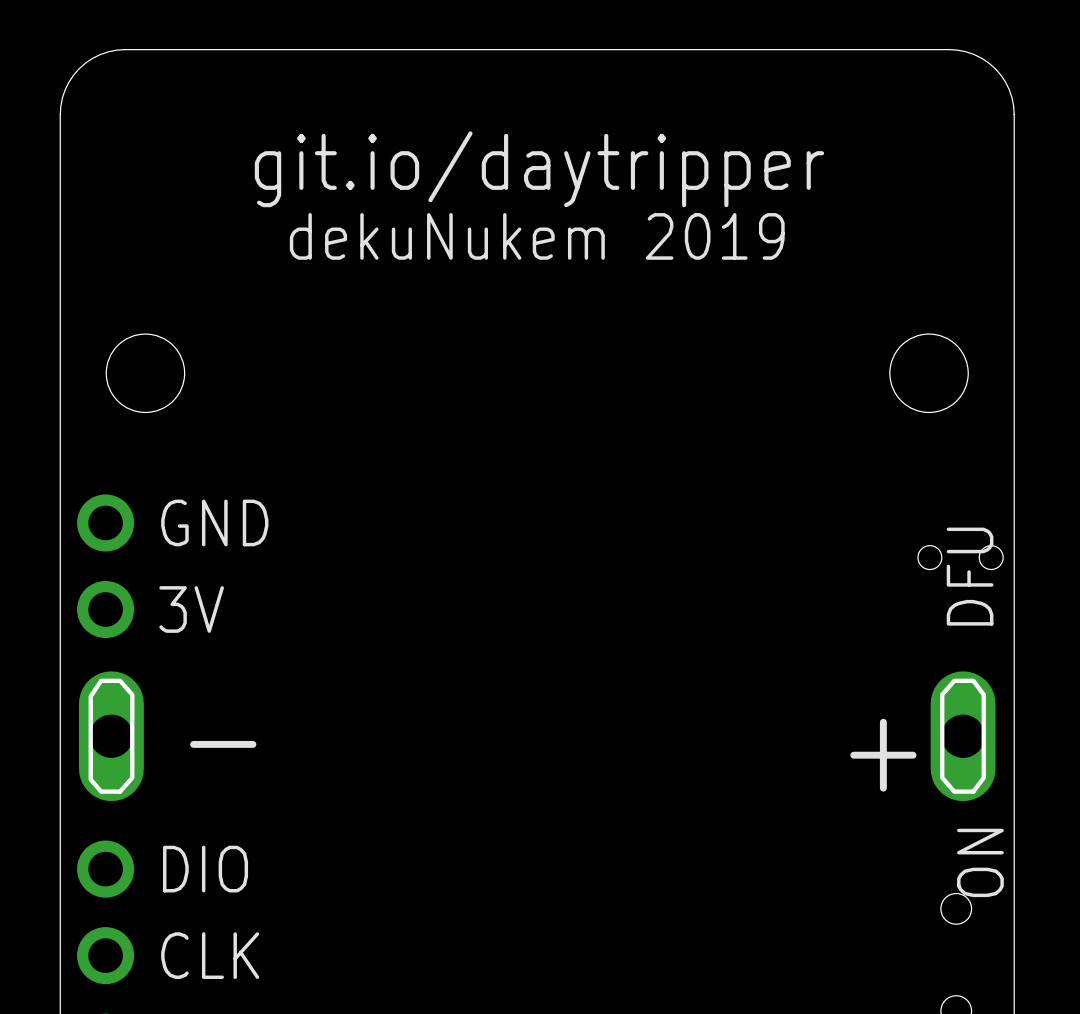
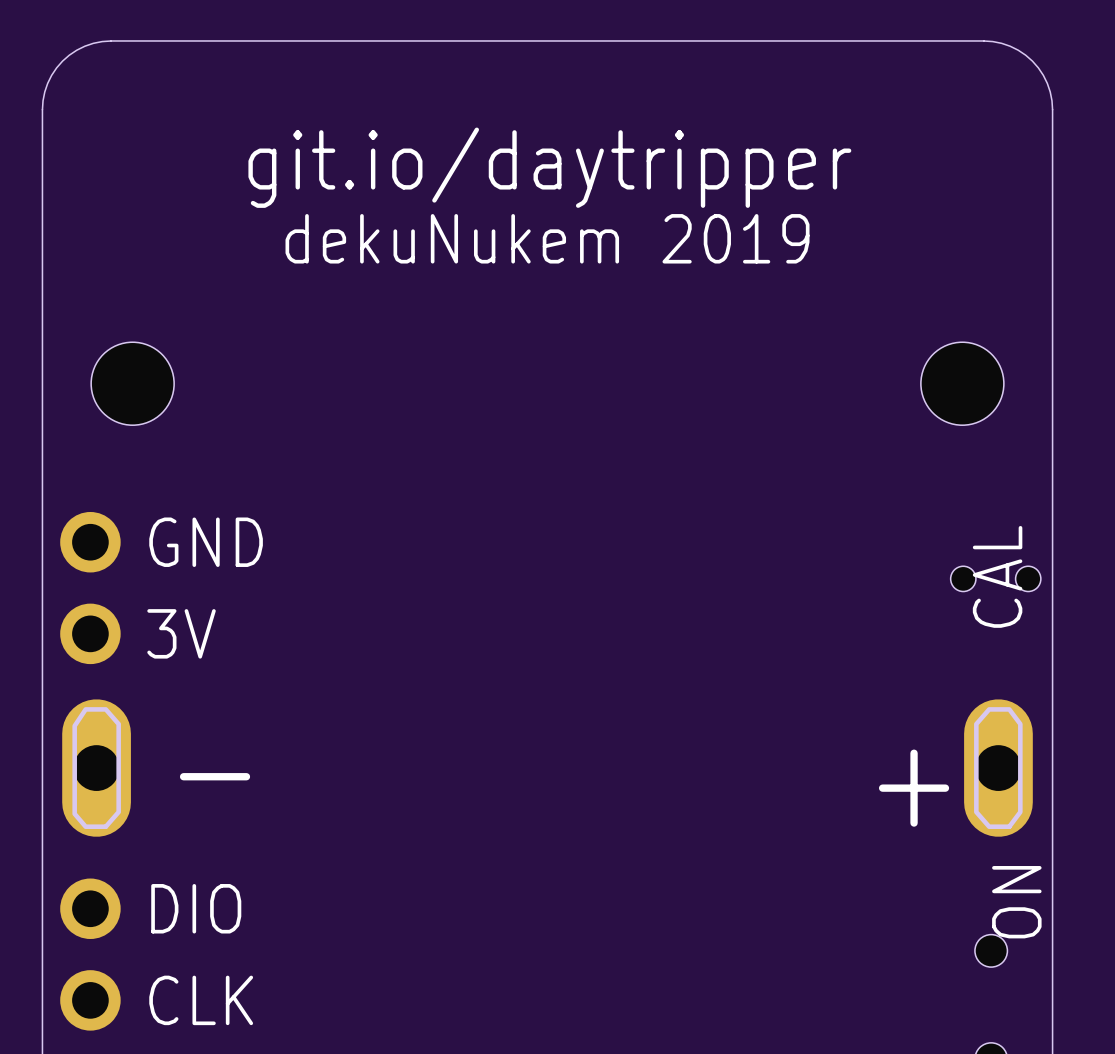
text: none -> CAL (997, 576)
text: DFU (970, 576) -> none

